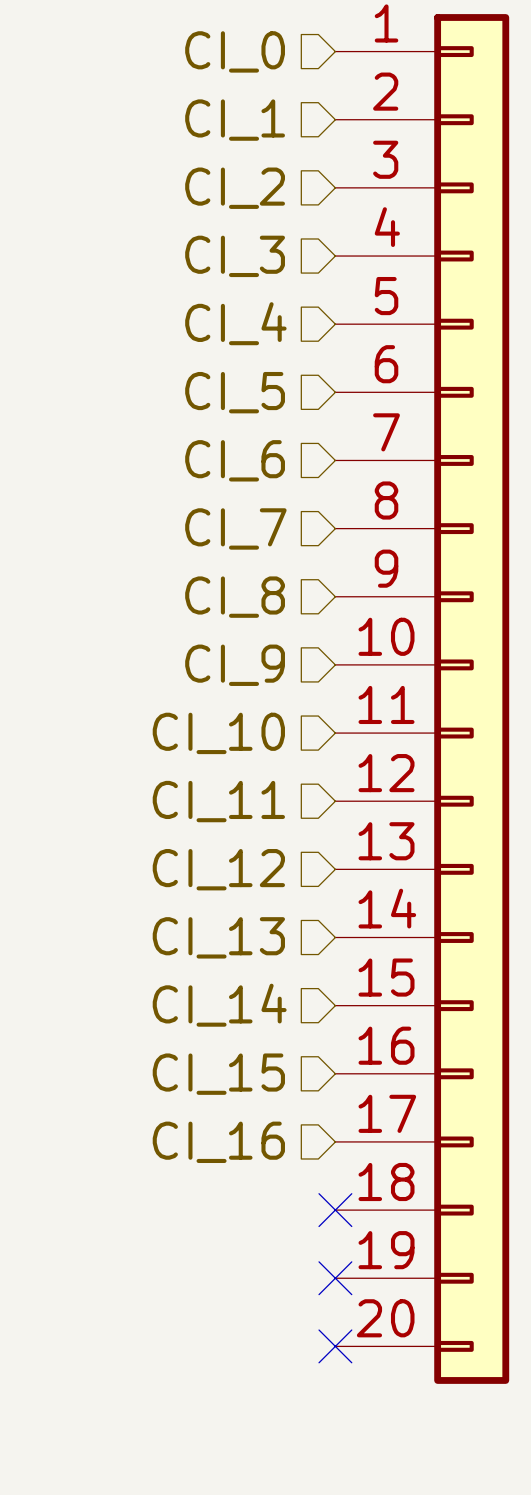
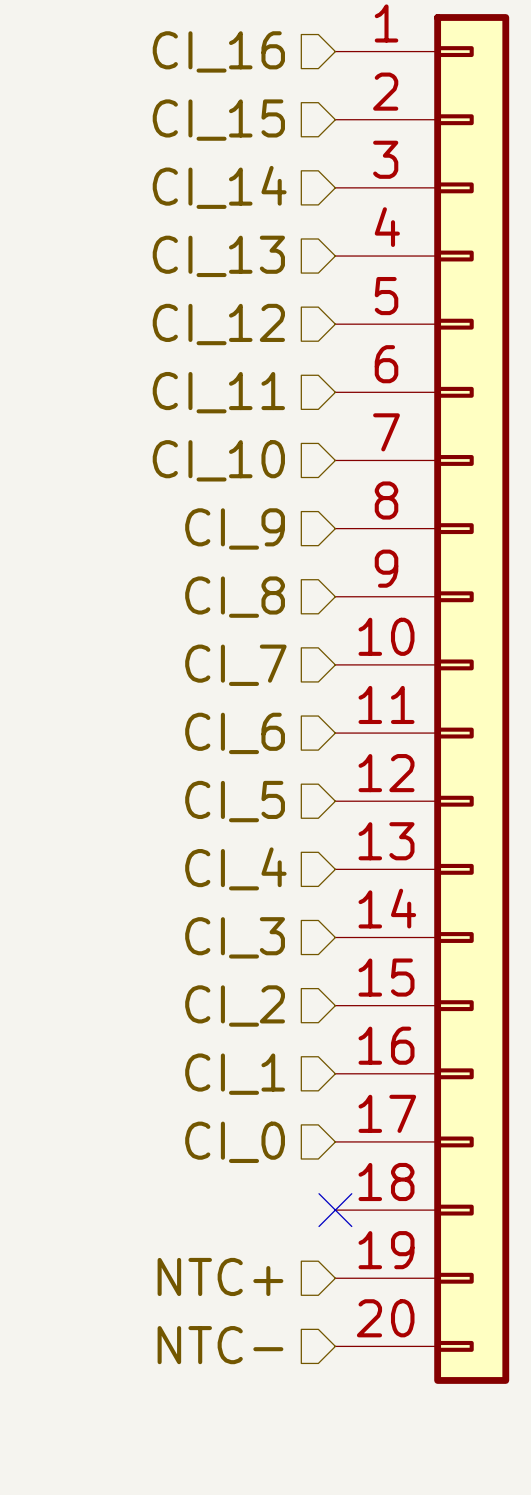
hierarchical label: CI_0 (235, 51) -> CI_16 (218, 51)
hierarchical label: CI_1 (235, 120) -> CI_15 (218, 120)
hierarchical label: CI_2 (235, 188) -> CI_14 (219, 187)
hierarchical label: CI_3 (235, 256) -> CI_13 (218, 256)
hierarchical label: CI_4 (235, 323) -> CI_12 (218, 324)
hierarchical label: CI_5 (235, 392) -> CI_11 (218, 392)
hierarchical label: CI_6 (235, 460) -> CI_10 (218, 460)
hierarchical label: CI_7 (235, 528) -> CI_9 (235, 528)
hierarchical label: CI_9 (235, 665) -> CI_7 (235, 665)
hierarchical label: CI_10 (218, 733) -> CI_6 (235, 733)
hierarchical label: CI_11 (218, 801) -> CI_5 (235, 801)
hierarchical label: CI_12 (218, 869) -> CI_4 (235, 868)
hierarchical label: CI_13 (218, 937) -> CI_3 (235, 937)
hierarchical label: CI_14 (219, 1005) -> CI_2 (235, 1006)
hierarchical label: CI_15 (218, 1074) -> CI_1 (235, 1074)
hierarchical label: CI_16 (218, 1142) -> CI_0 (235, 1142)
hierarchical label: none -> NTC+ (220, 1276)
no-connect mark: (335, 1278) -> none
hierarchical label: none -> NTC- (220, 1345)
no-connect mark: (335, 1346) -> none

